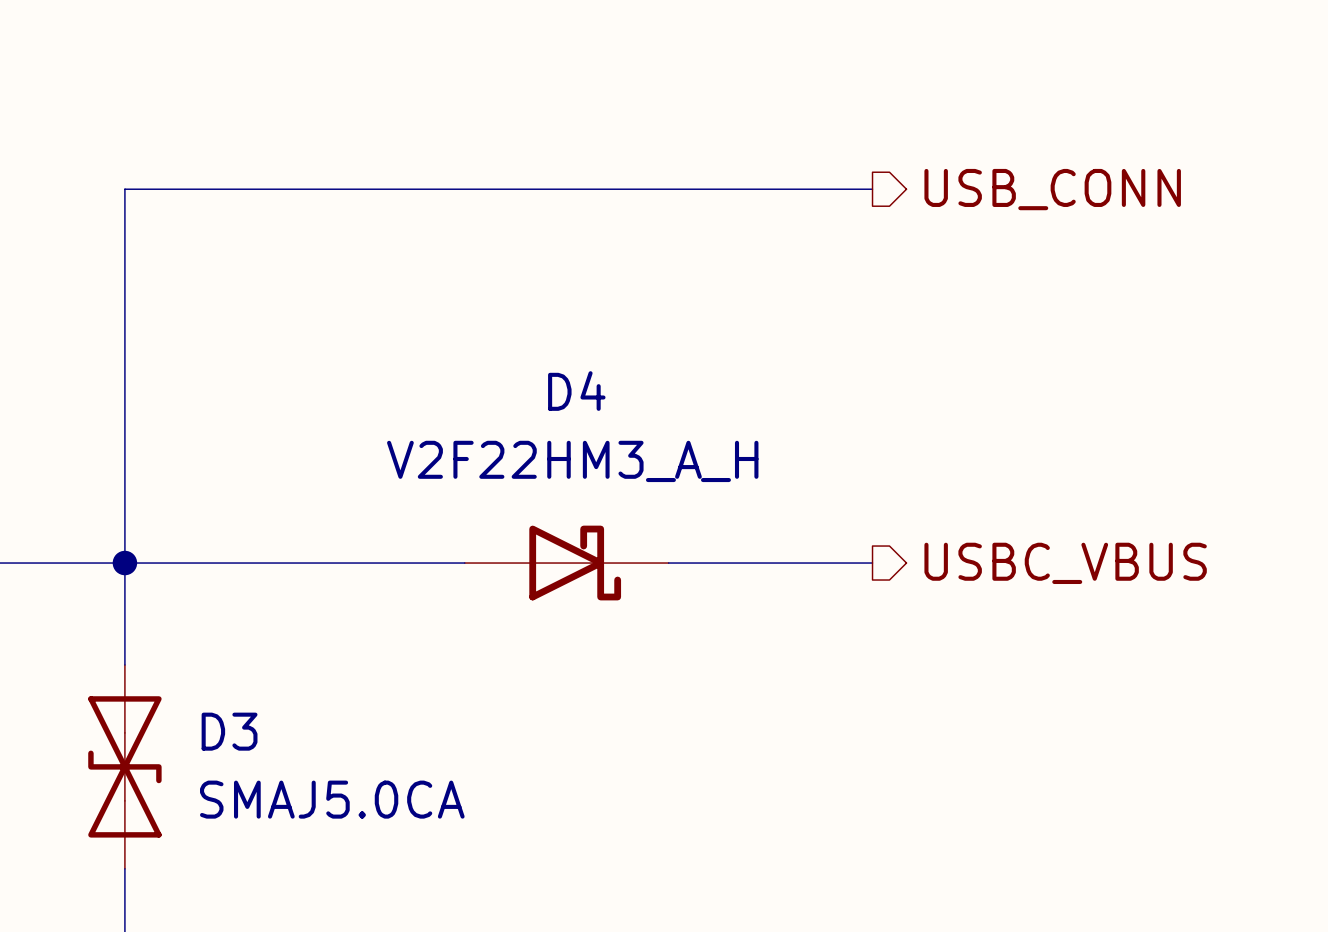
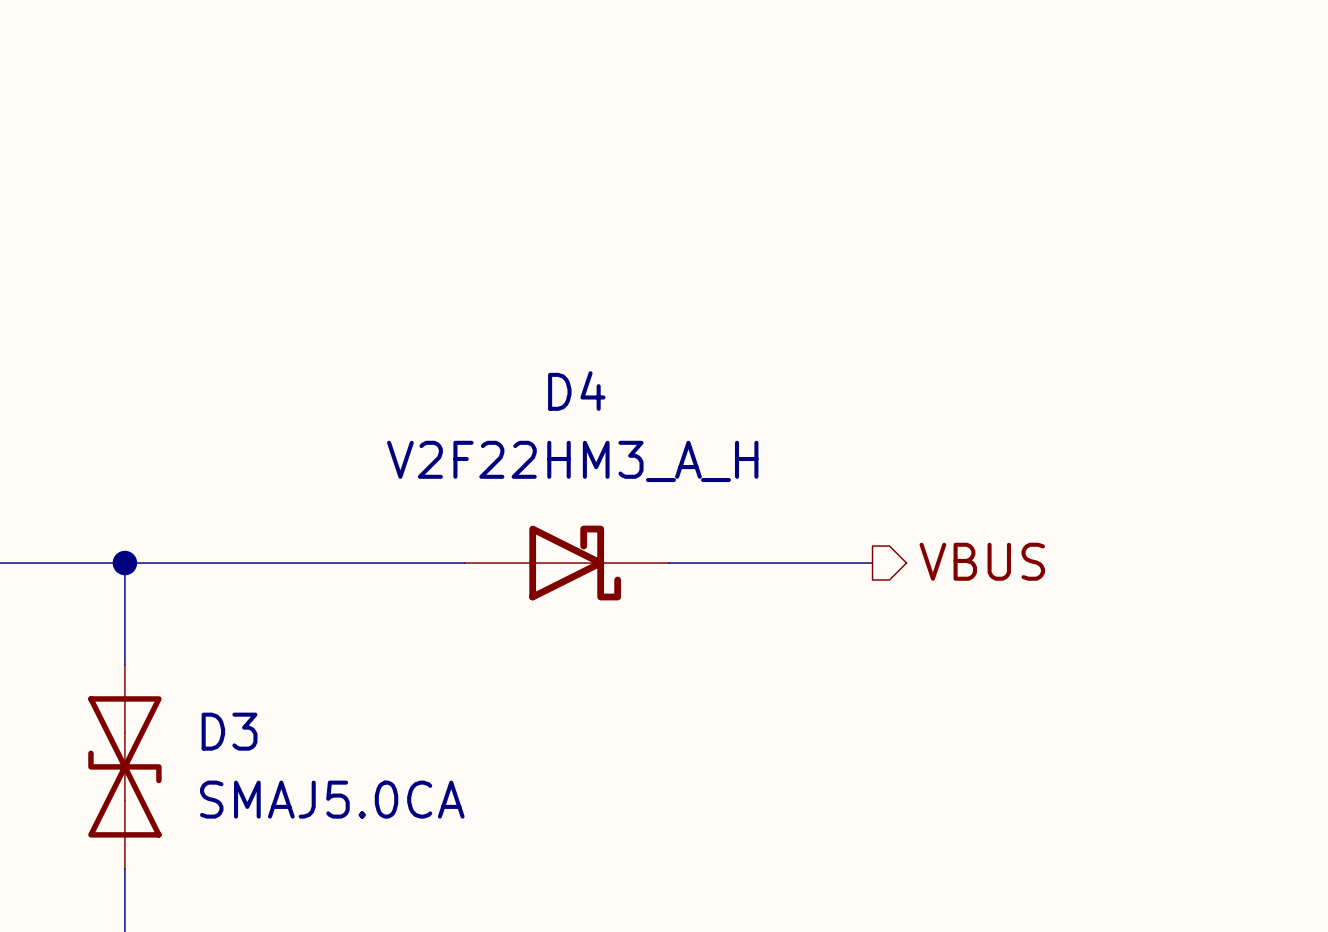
wire: (872, 189) (124, 189) (124, 563) -> none
hierarchical label: USB_CONN (1052, 189) -> none
hierarchical label: USBC_VBUS (1065, 563) -> VBUS (982, 561)

